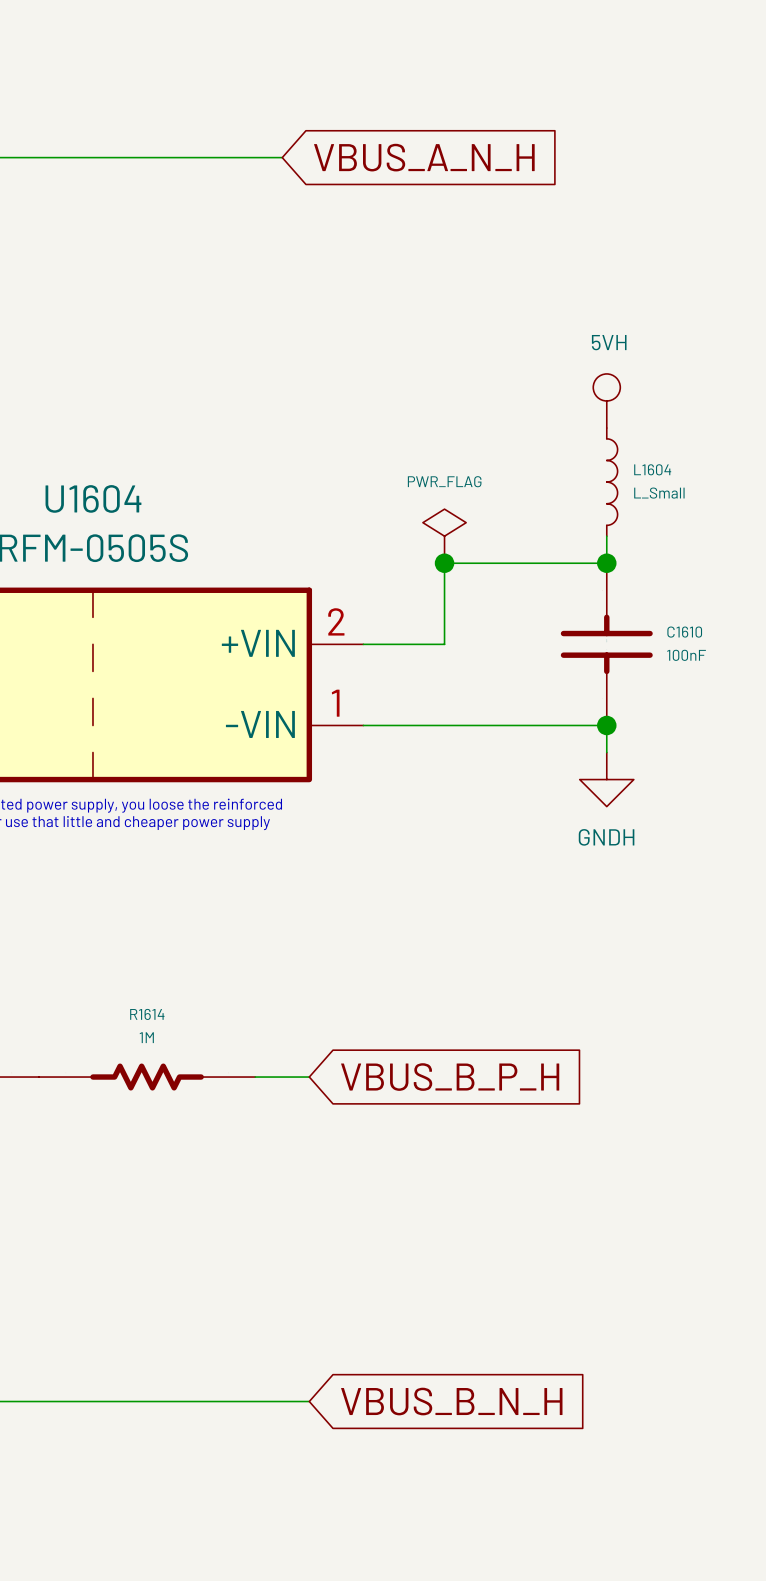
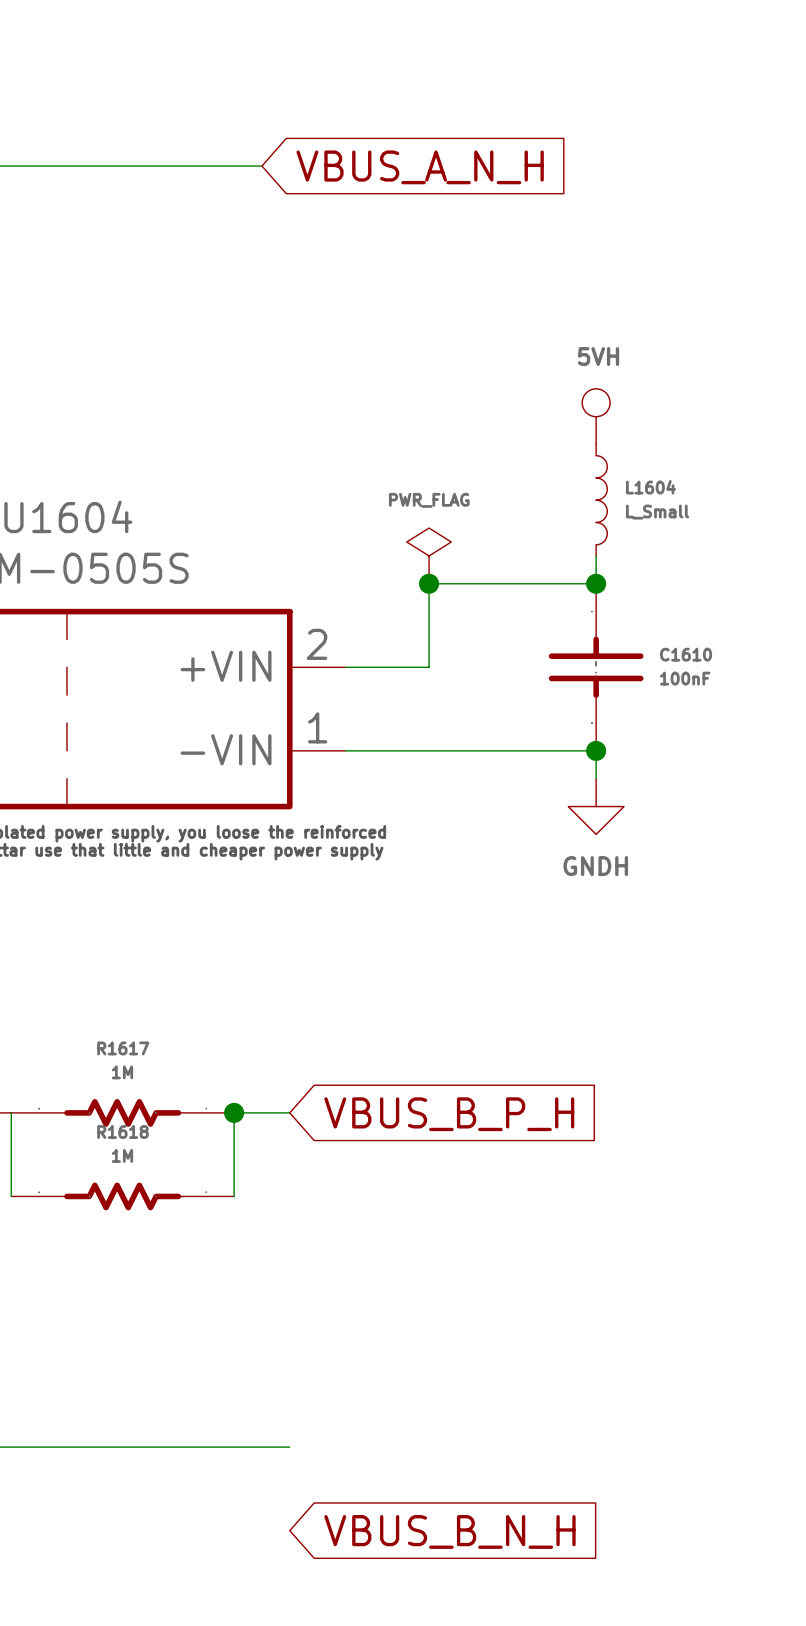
R1614 name: R1614 (147, 1014) -> R1617 (123, 1048)
wire: none -> (11, 1112) (11, 1196)
wire: none -> (234, 1112) (234, 1196)
junction: none -> (234, 1112)
R1618: none -> 1M (122, 1196)
global label position: VBUS_B_N_H (451, 1401) -> VBUS_B_N_H (449, 1531)

